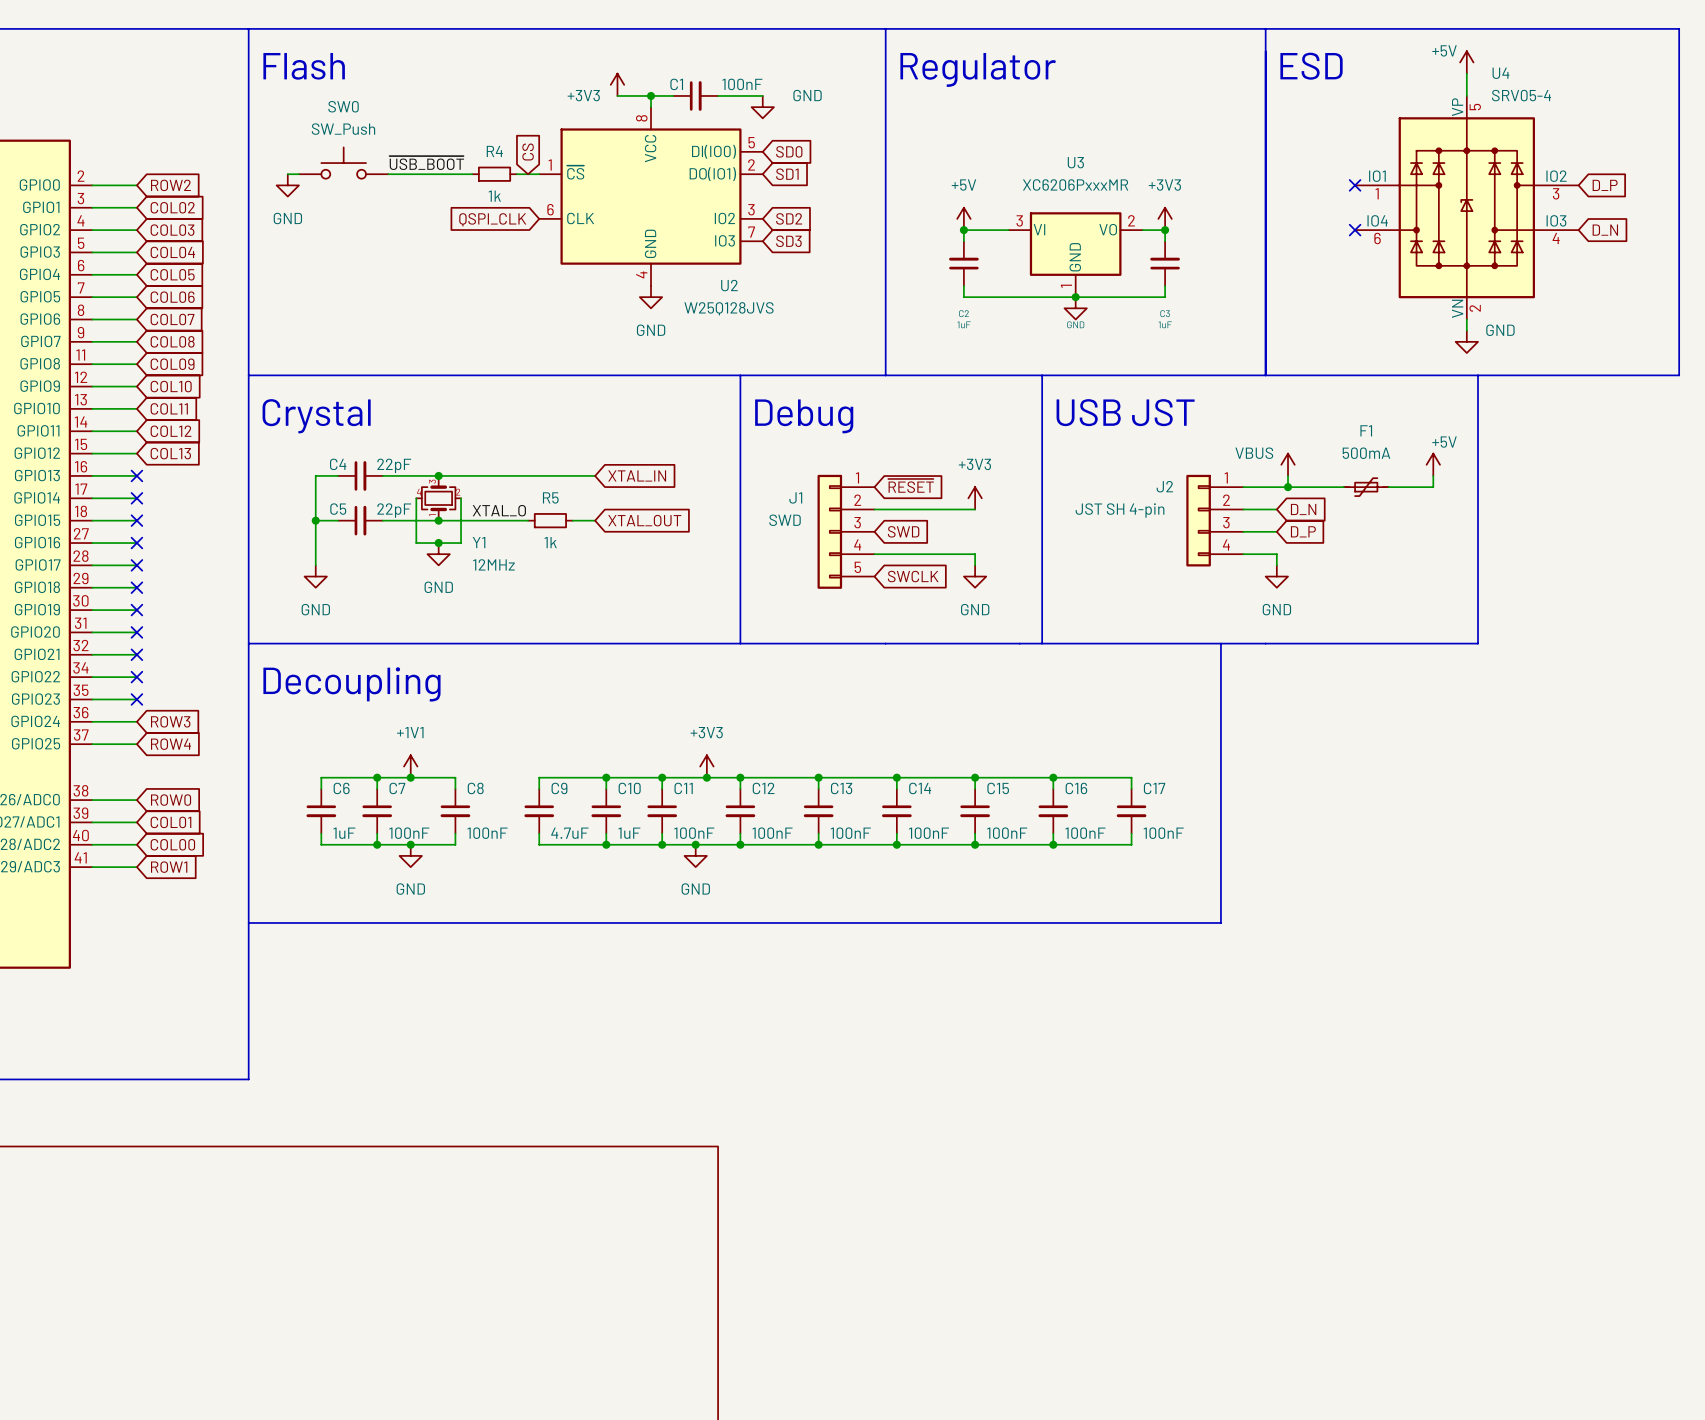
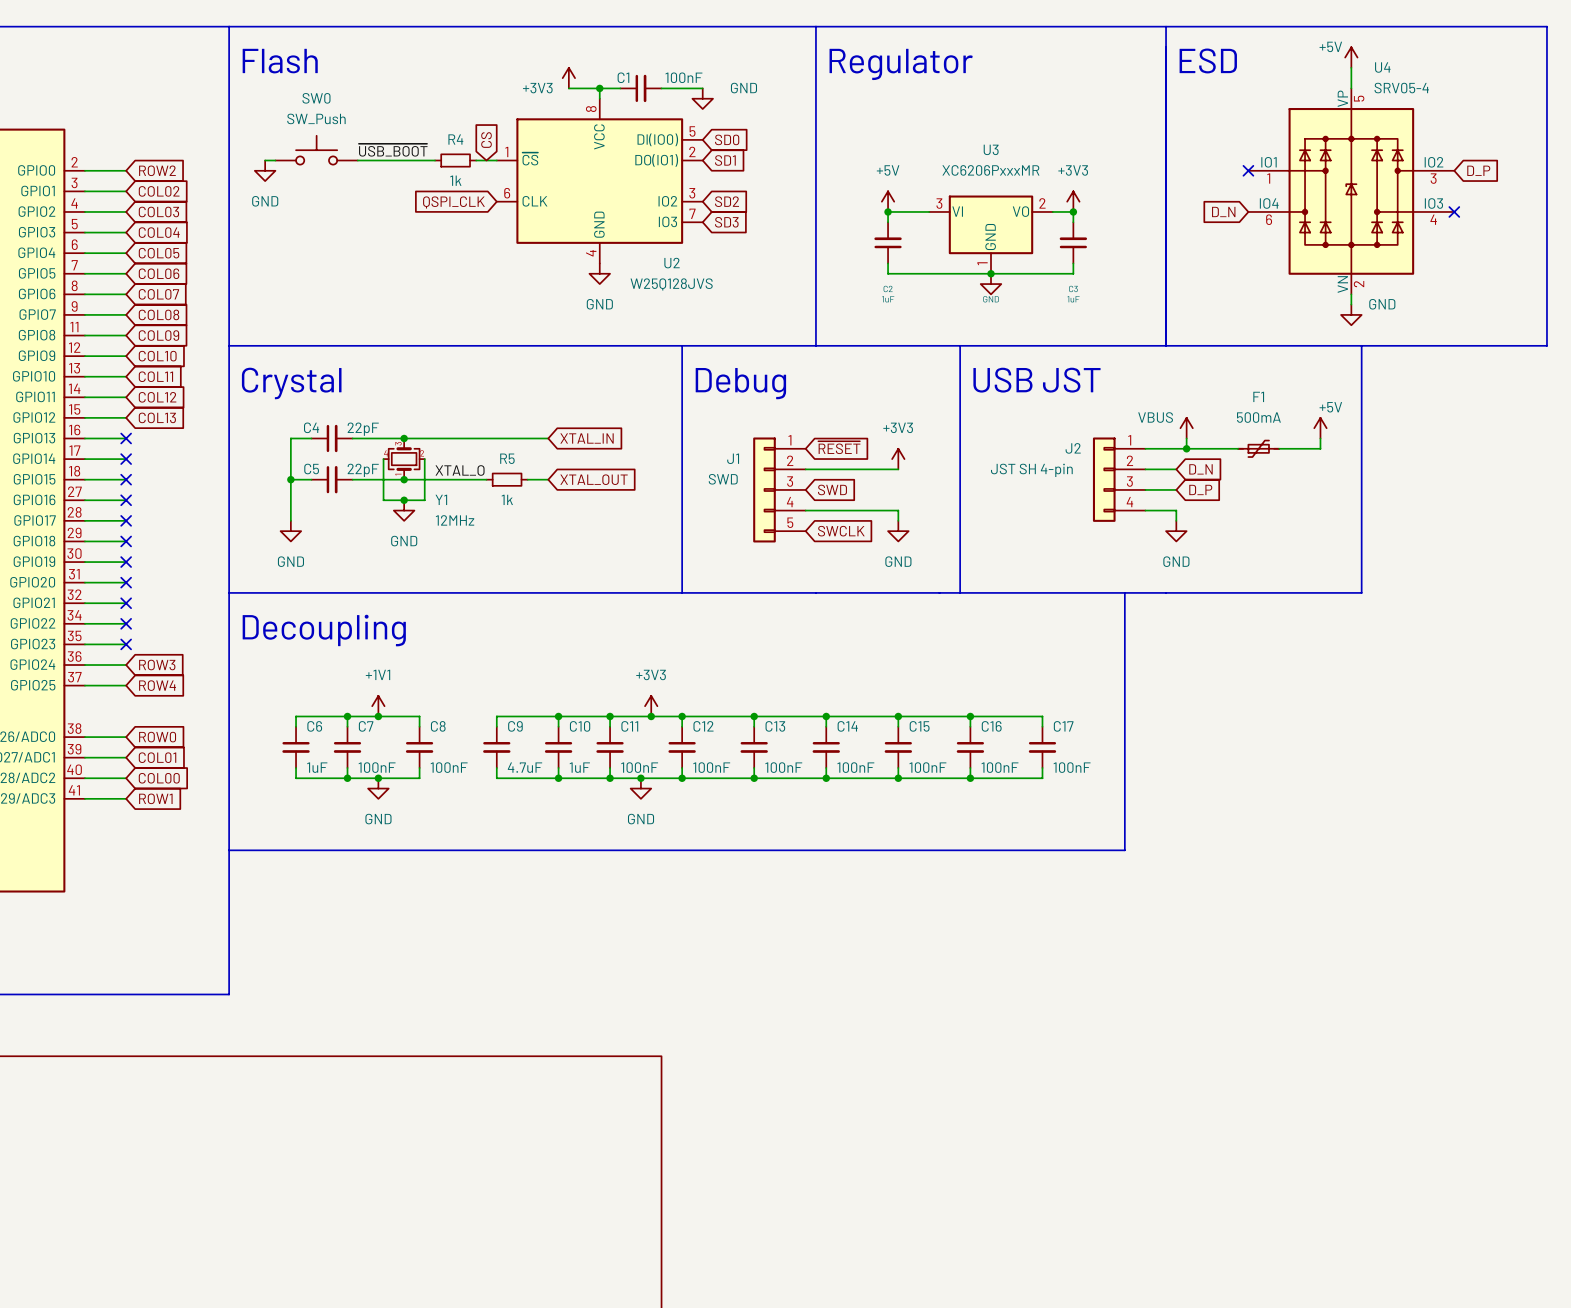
global label: none -> D_N (1223, 211)
no-connect mark: (1355, 230) -> none
no-connect mark: none -> (1454, 211)
global label: D_N (1605, 230) -> none

